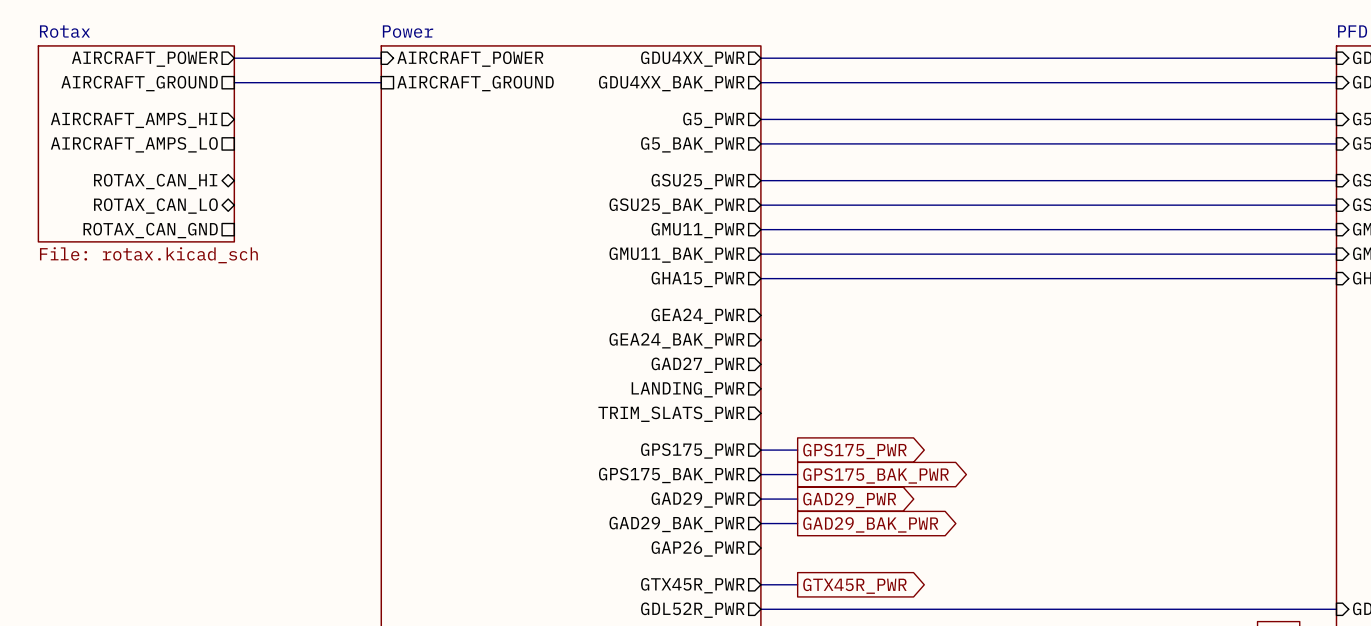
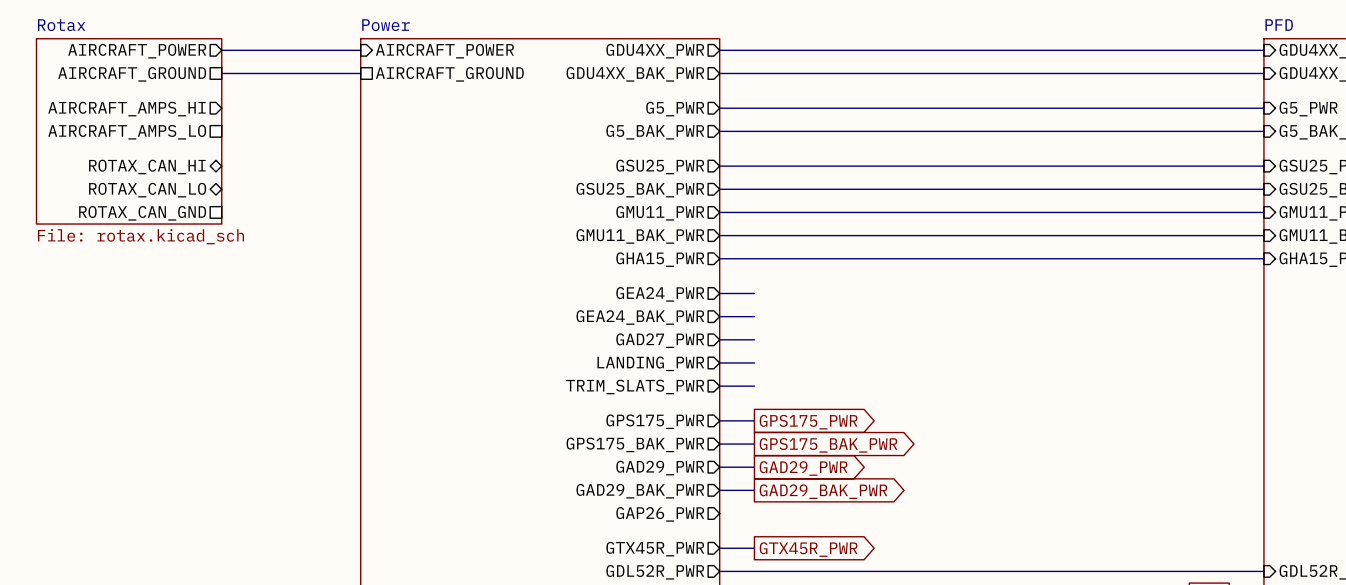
wire: none -> (719, 293) (754, 293)
wire: none -> (719, 316) (754, 316)
wire: none -> (719, 339) (754, 339)
wire: none -> (719, 362) (754, 362)
wire: none -> (719, 386) (754, 386)

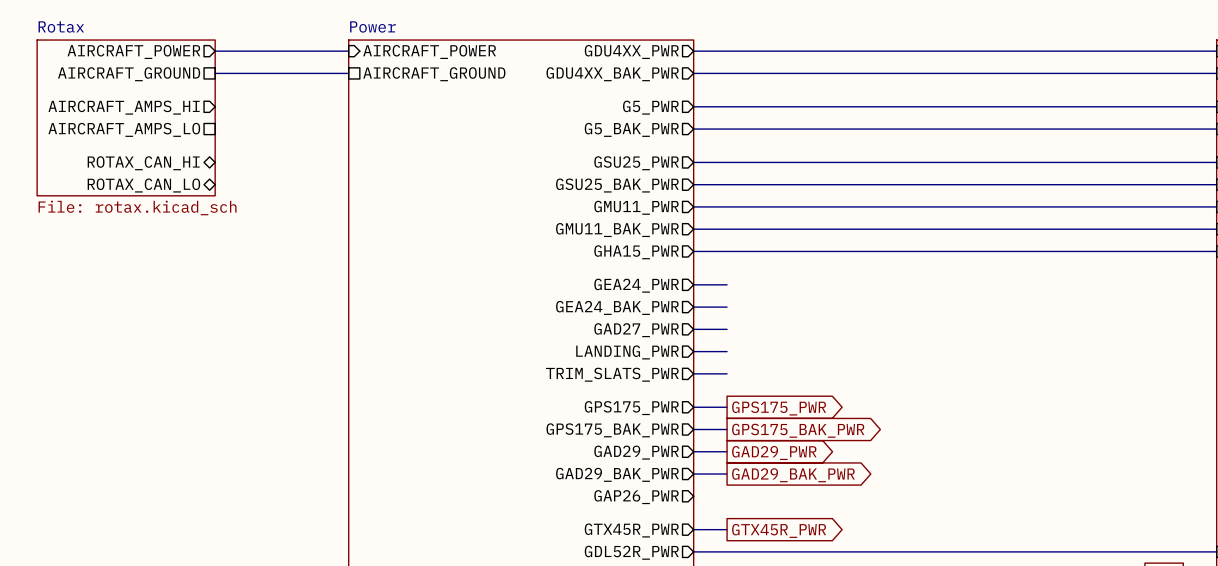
sheet Rotax: none -> File: rotax.kicad_sch (126, 117)
sheet Rotax: File: rotax.kicad_sch (129, 131) -> none
sheet pin: ROTAX_CAN_GND (142, 213) -> none

